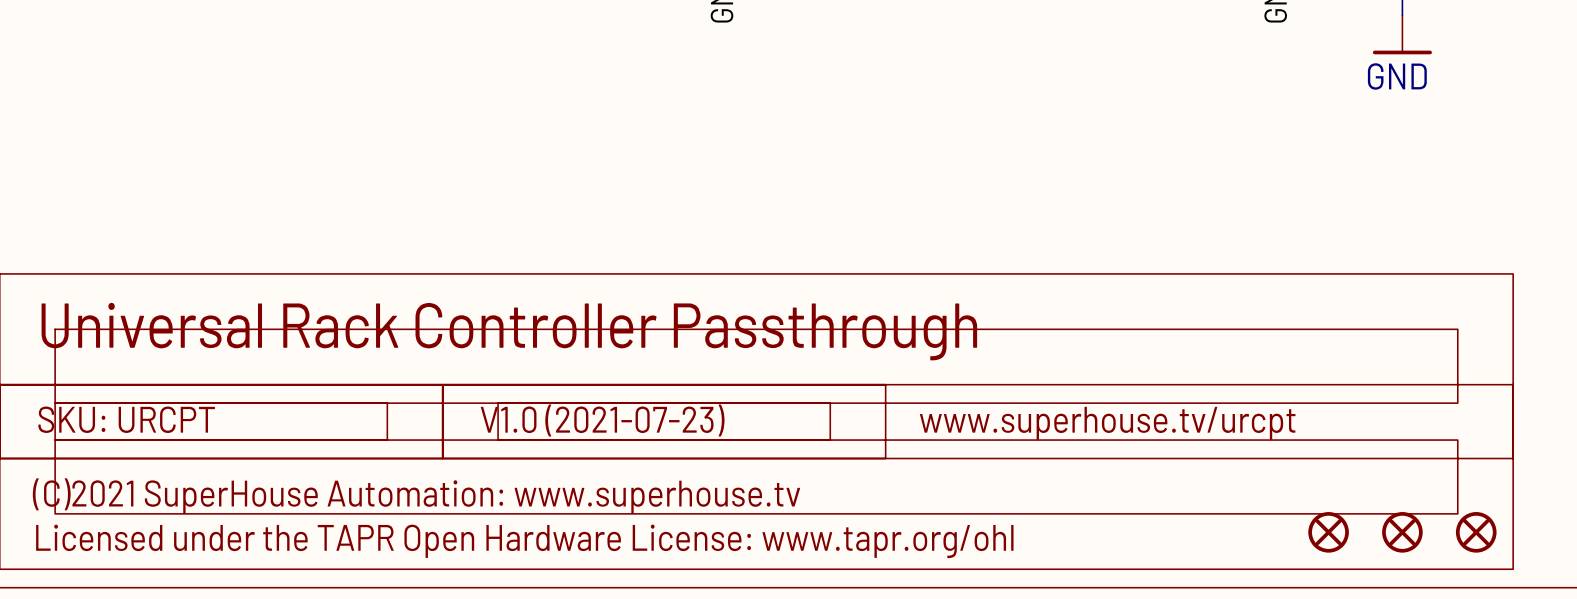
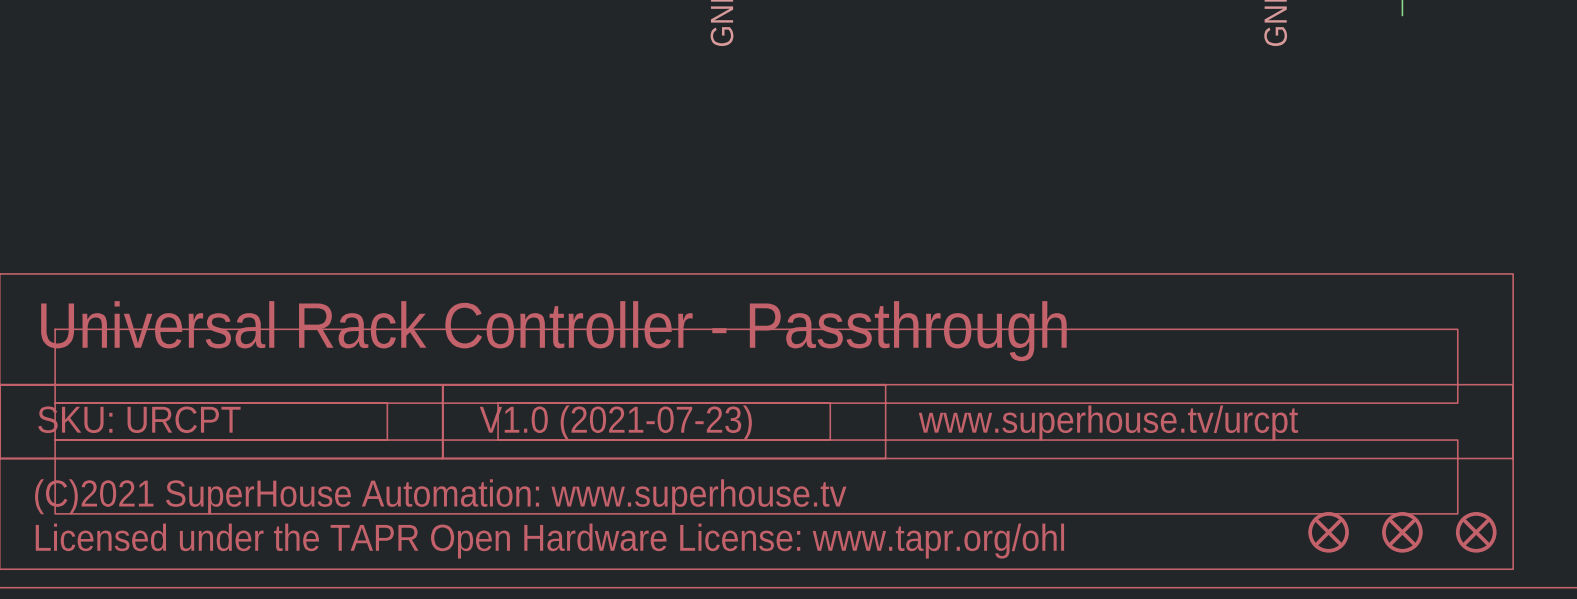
power symbol: GND (1402, 34) -> none
text: Universal Rack Controller Passthrough (509, 331) -> Universal Rack Controller - Passthrough (553, 331)

